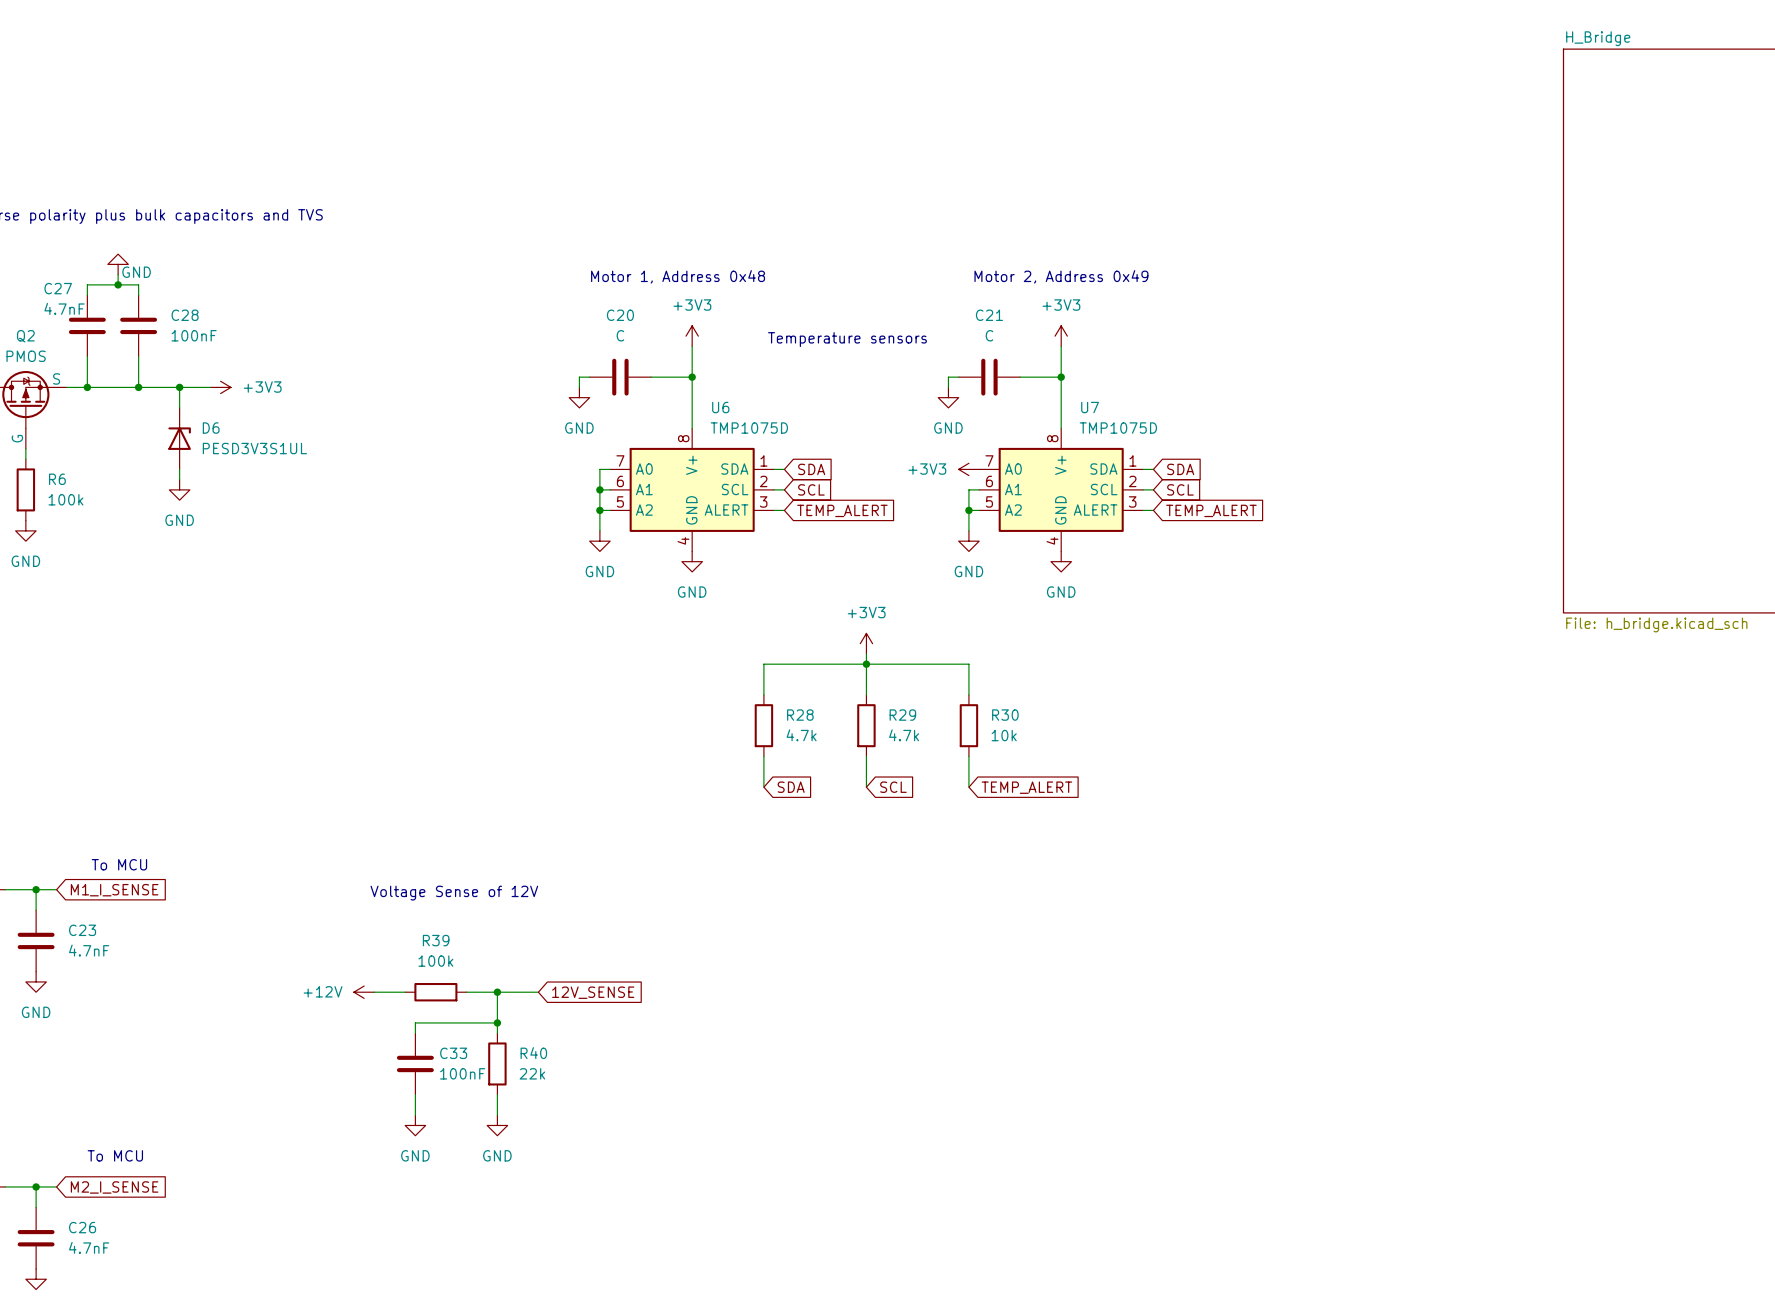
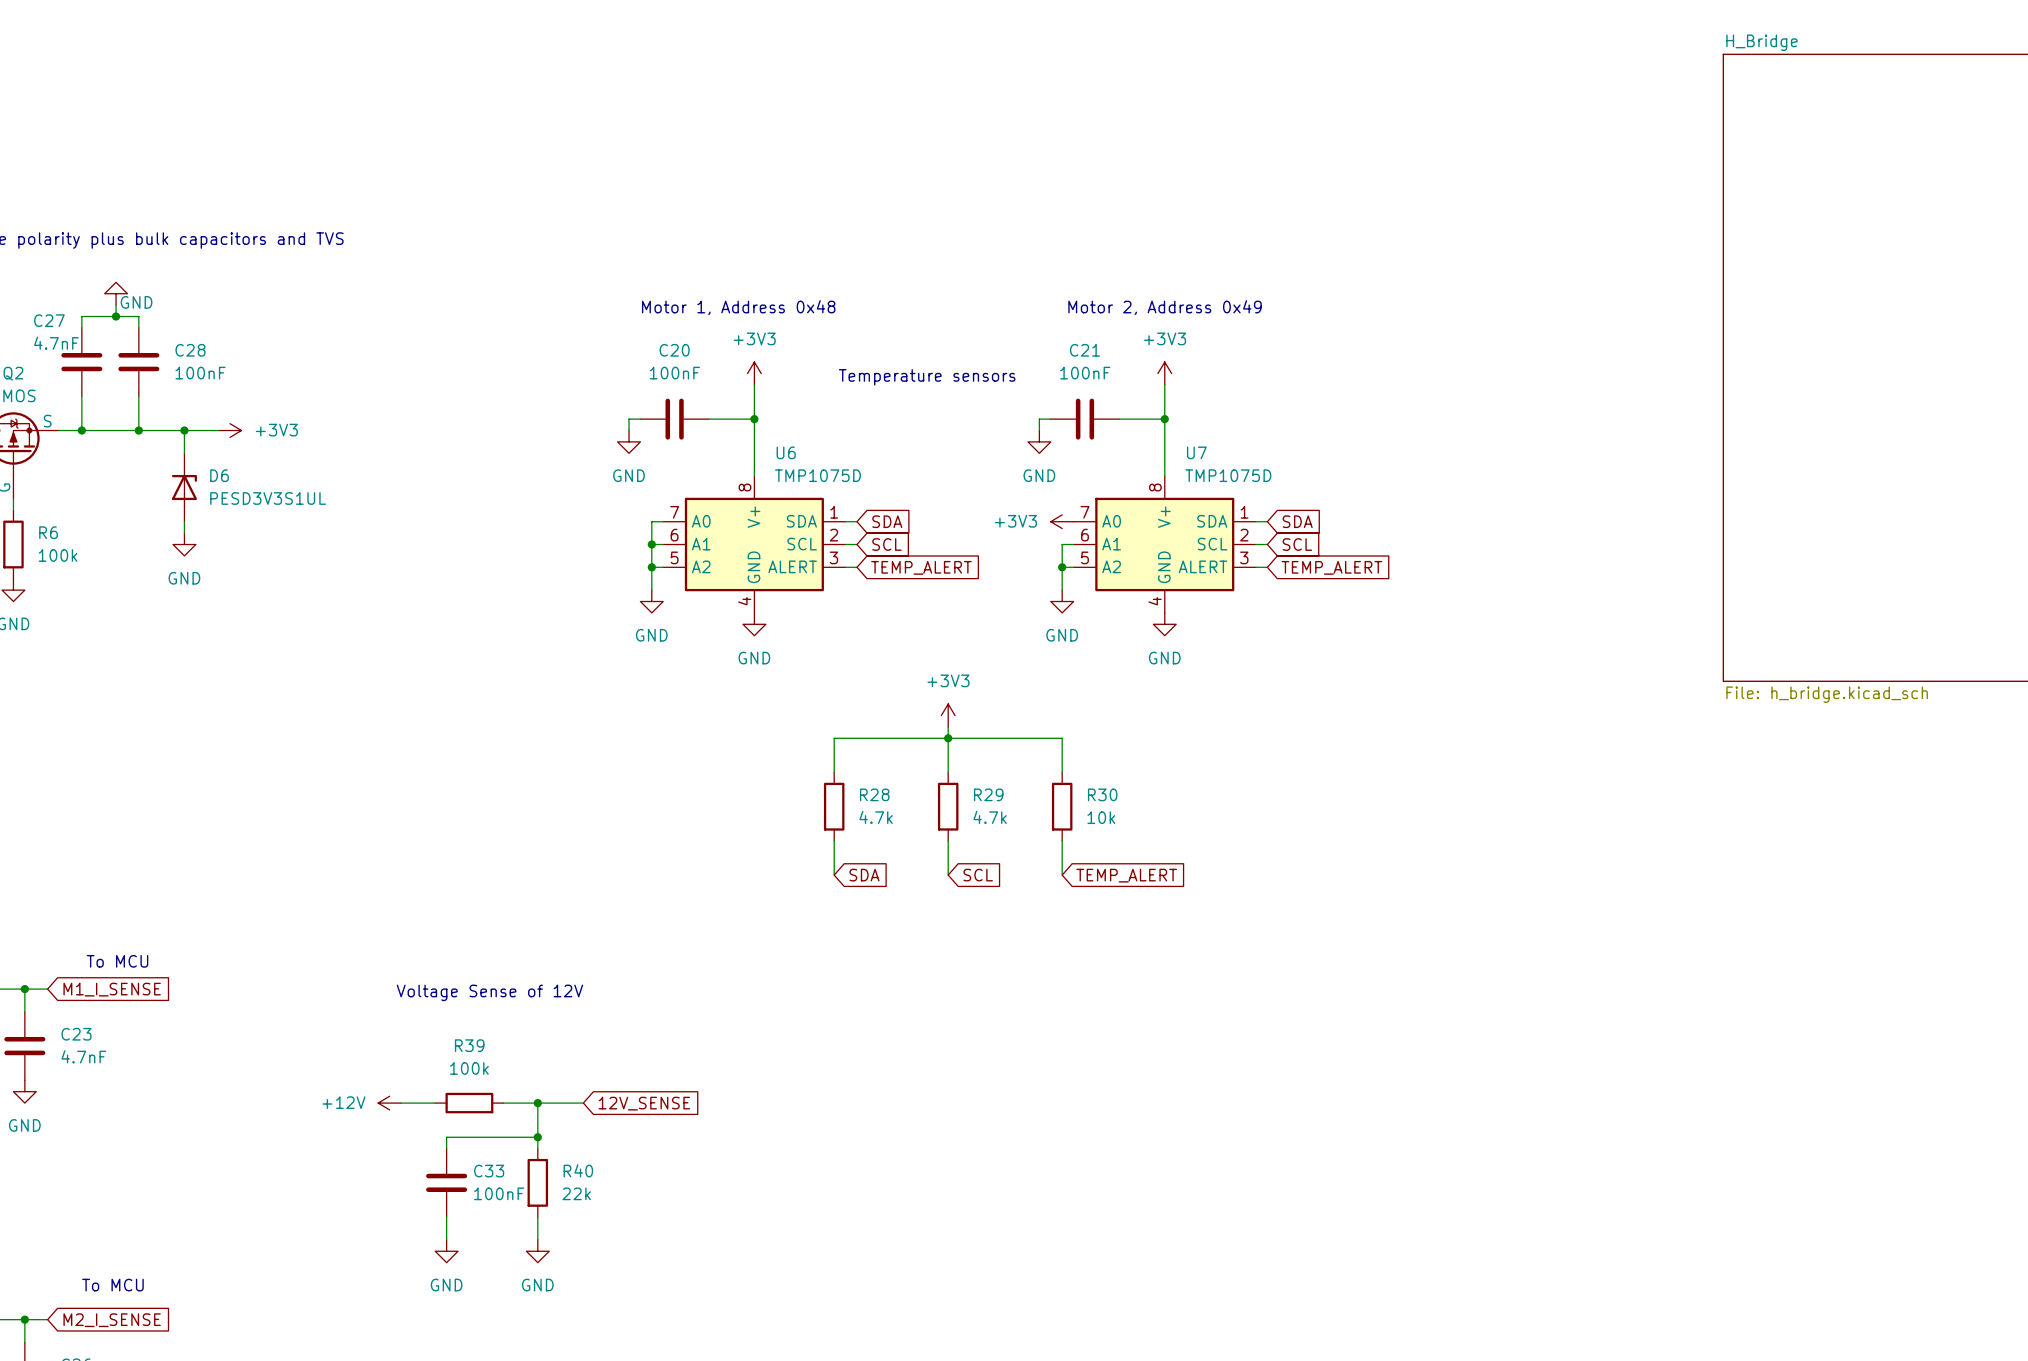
C20 value: C (620, 335) -> 100nF (674, 373)
C21 value: C (989, 335) -> 100nF (1085, 373)

